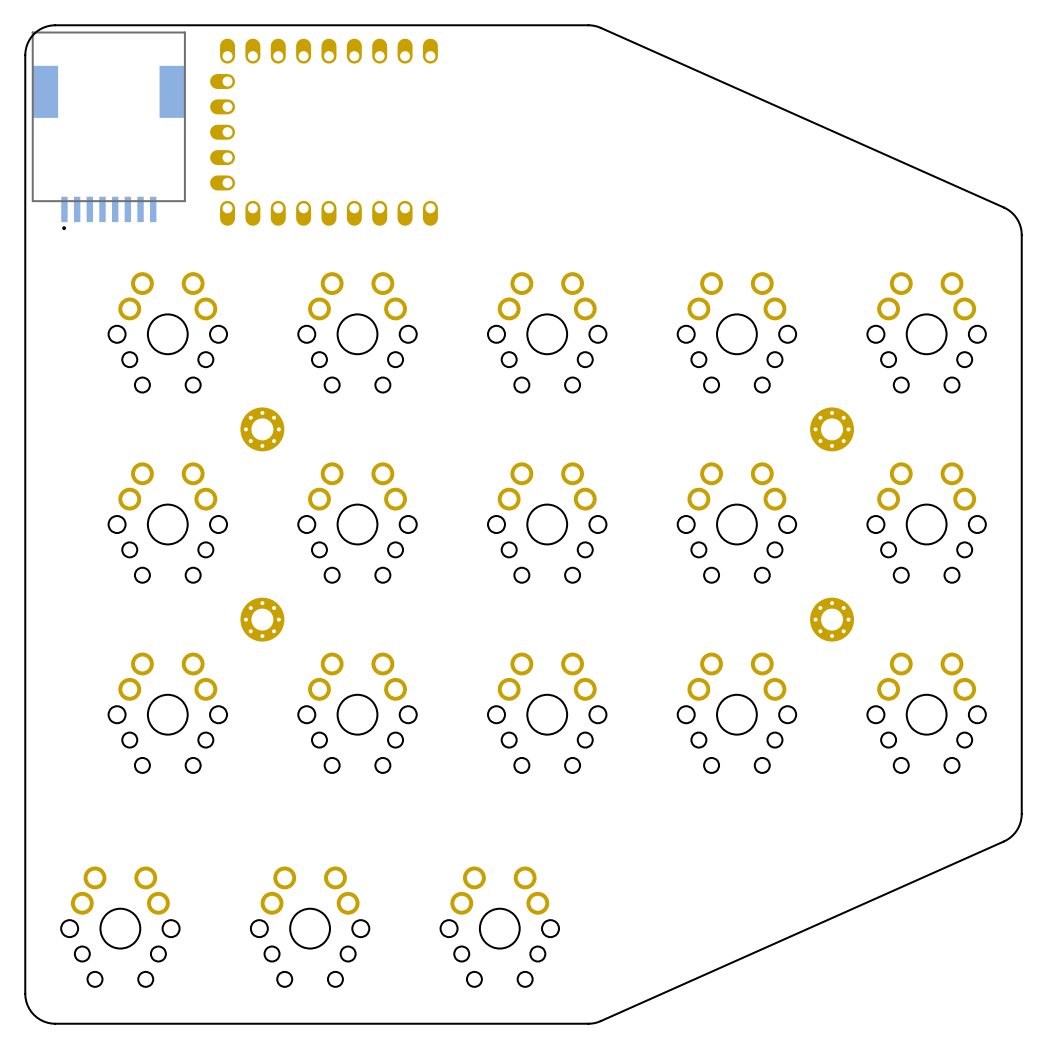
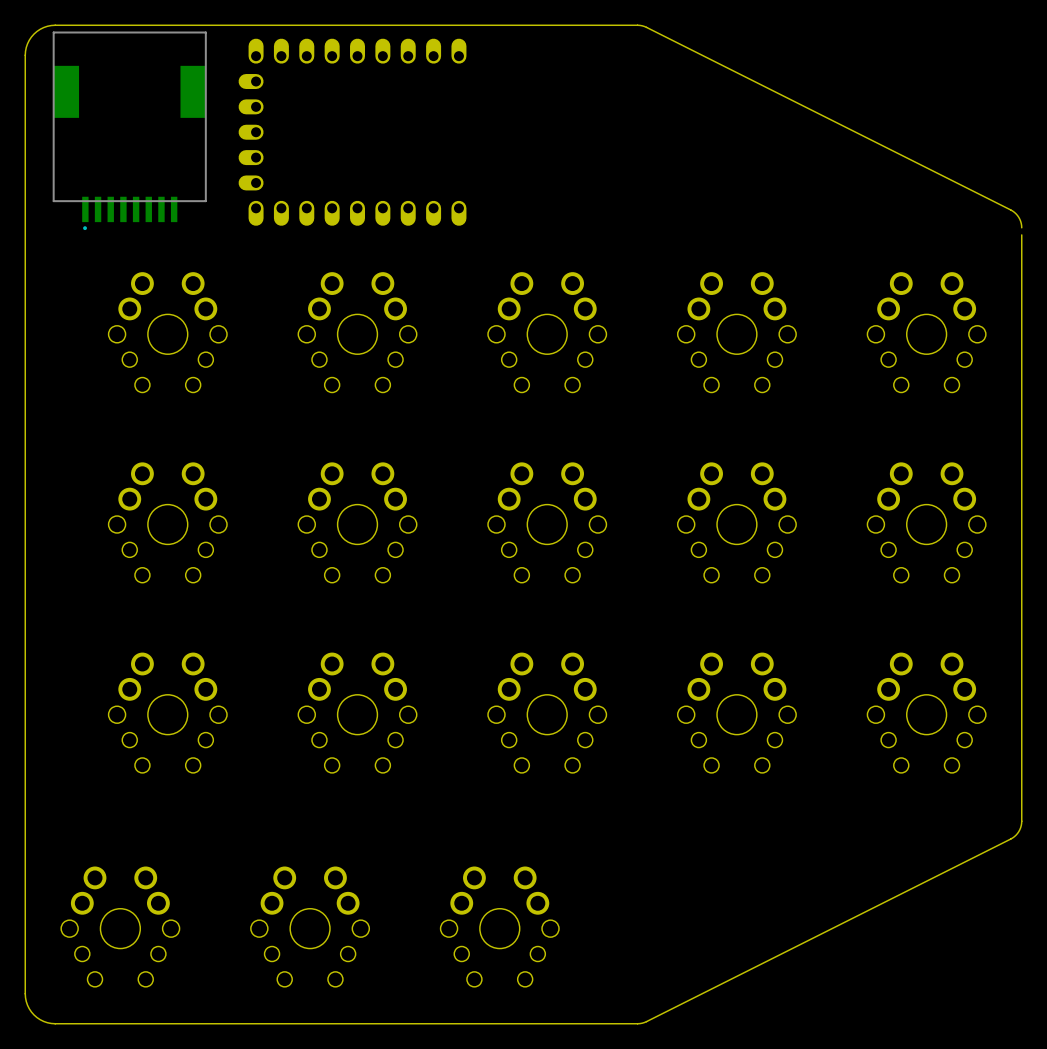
board edge: (588, 25) (600, 27) (1003, 207) (1016, 218) (1021, 234) -> (588, 25) (637, 25) (646, 27) (1010, 209) (1018, 217) (1021, 227)
part position: (108, 130) -> (129, 130)
part position: (323, 132) -> (352, 132)
part: (262, 429) -> none
part: (832, 429) -> none
part: (262, 619) -> none
part: (832, 619) -> none
board edge: (1021, 814) (1016, 830) (1003, 841) (600, 1021) (588, 1023) -> (1021, 814) (1019, 829) (1010, 839) (646, 1021) (637, 1023) (588, 1023)

